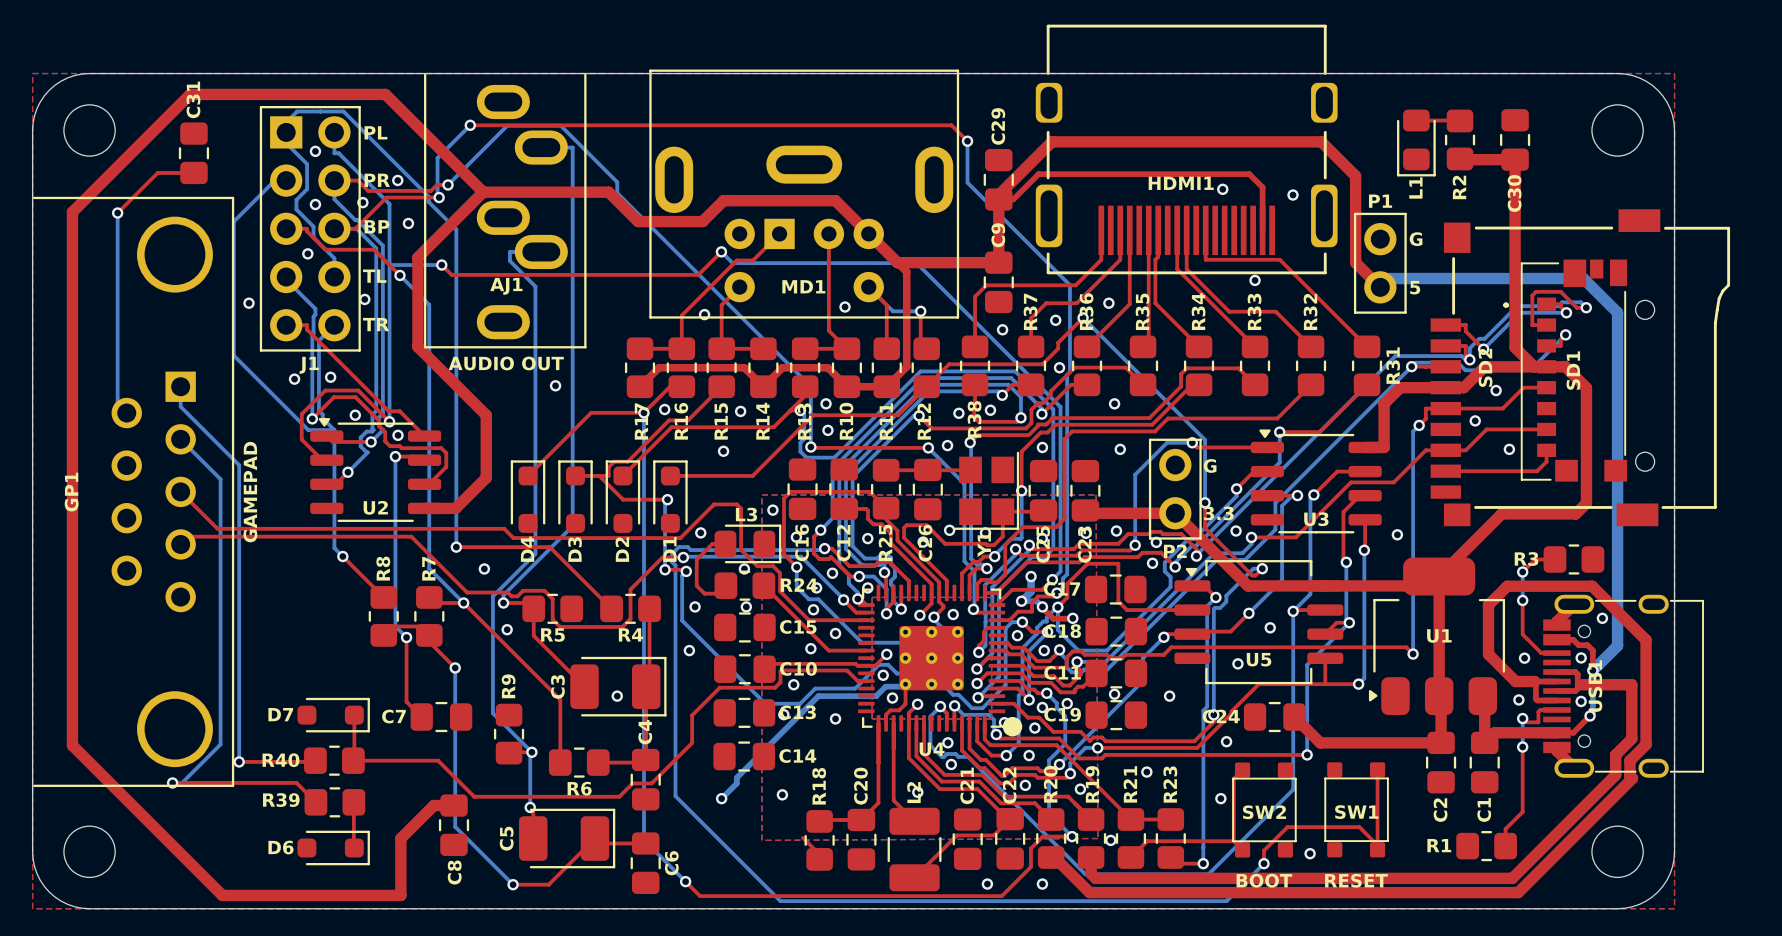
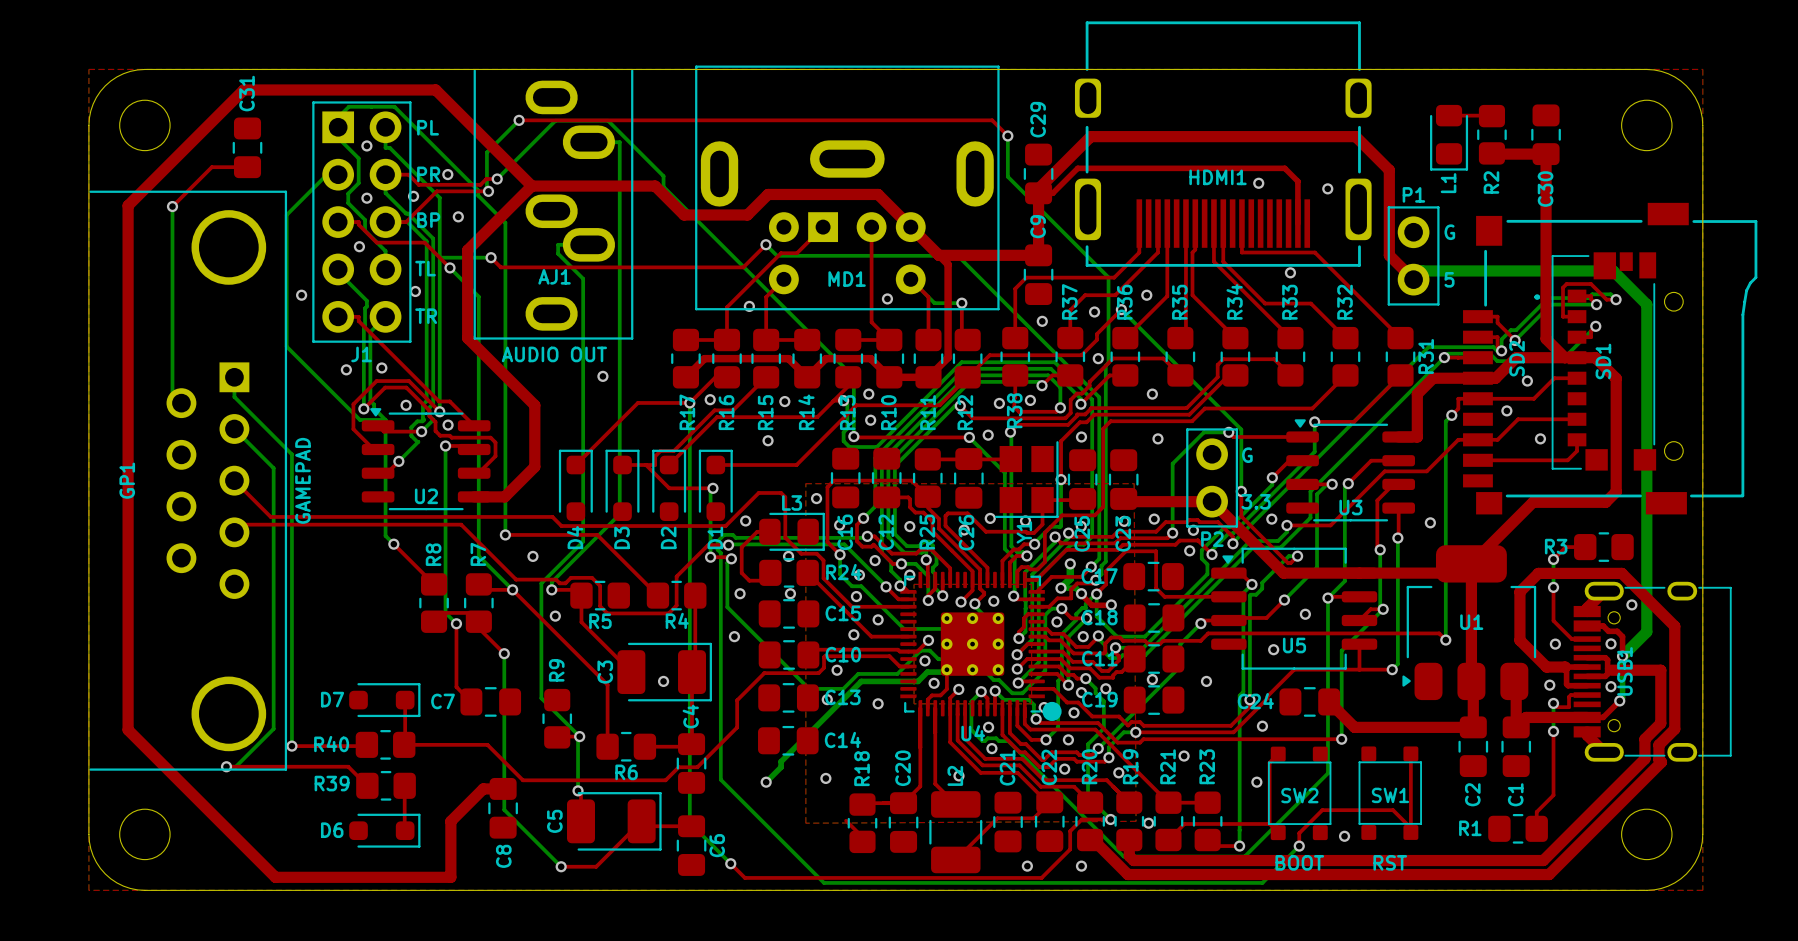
text: RESET (1356, 880) -> RST (1390, 862)

